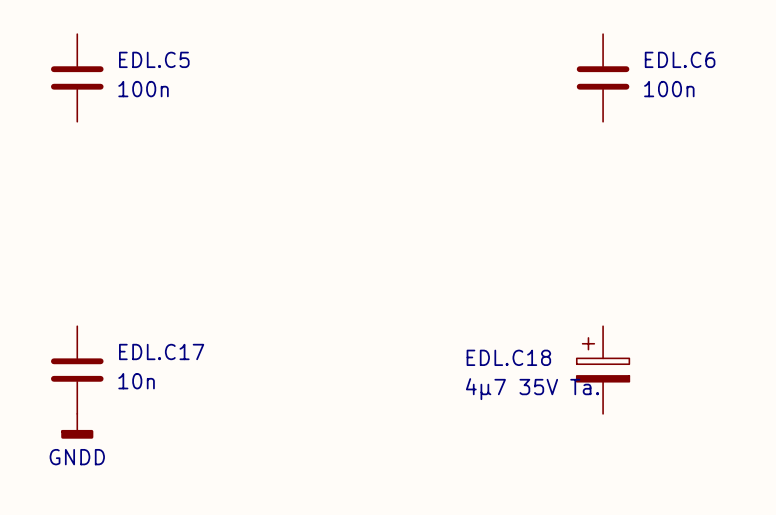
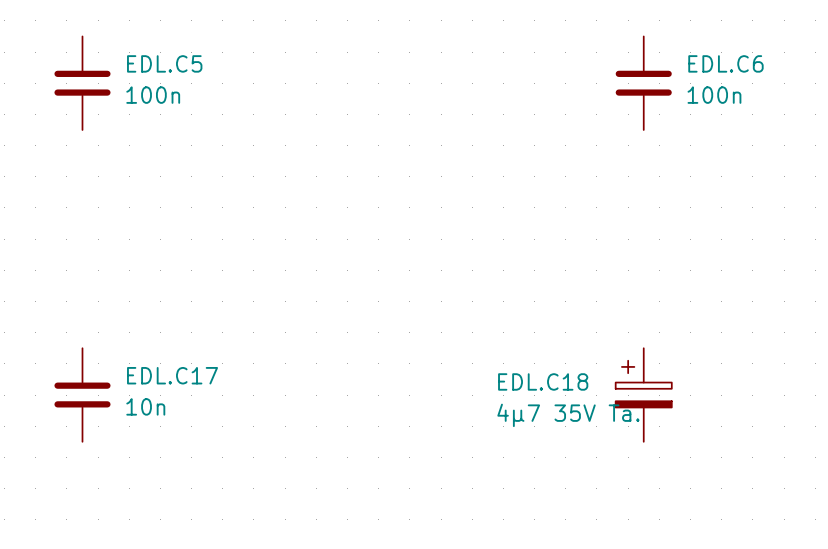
power symbol: GNDD (77, 426) -> none

